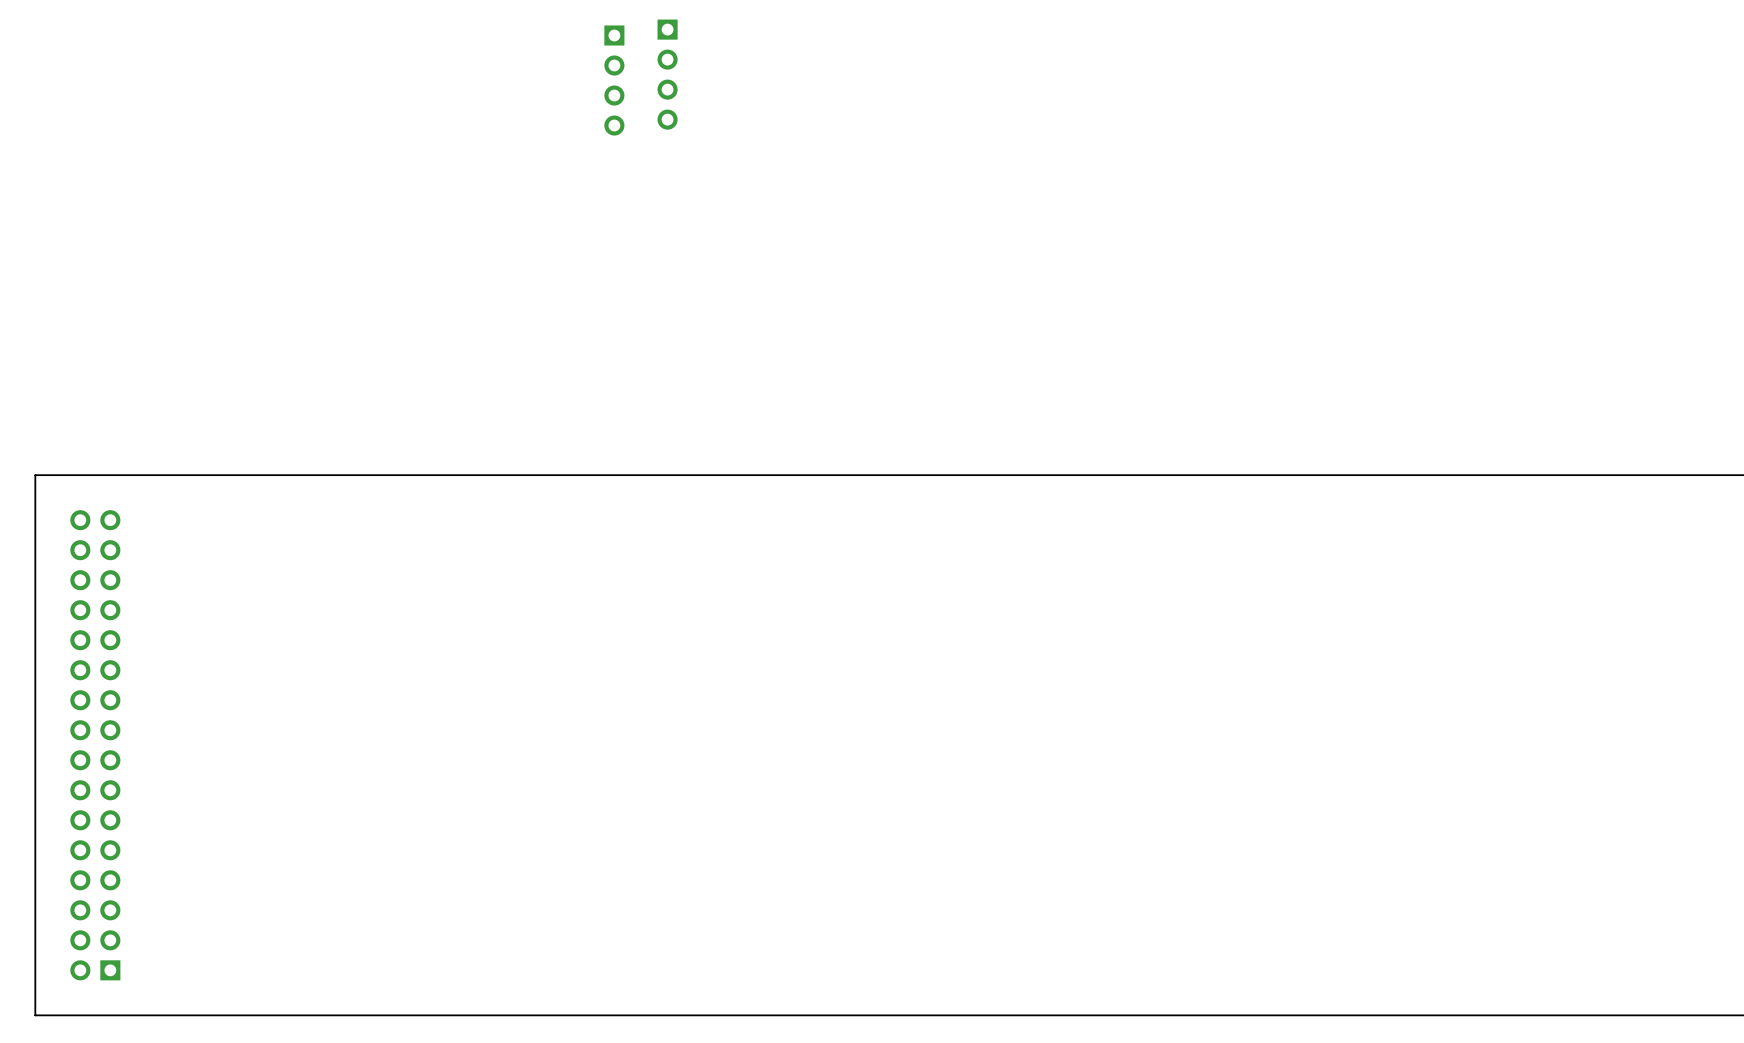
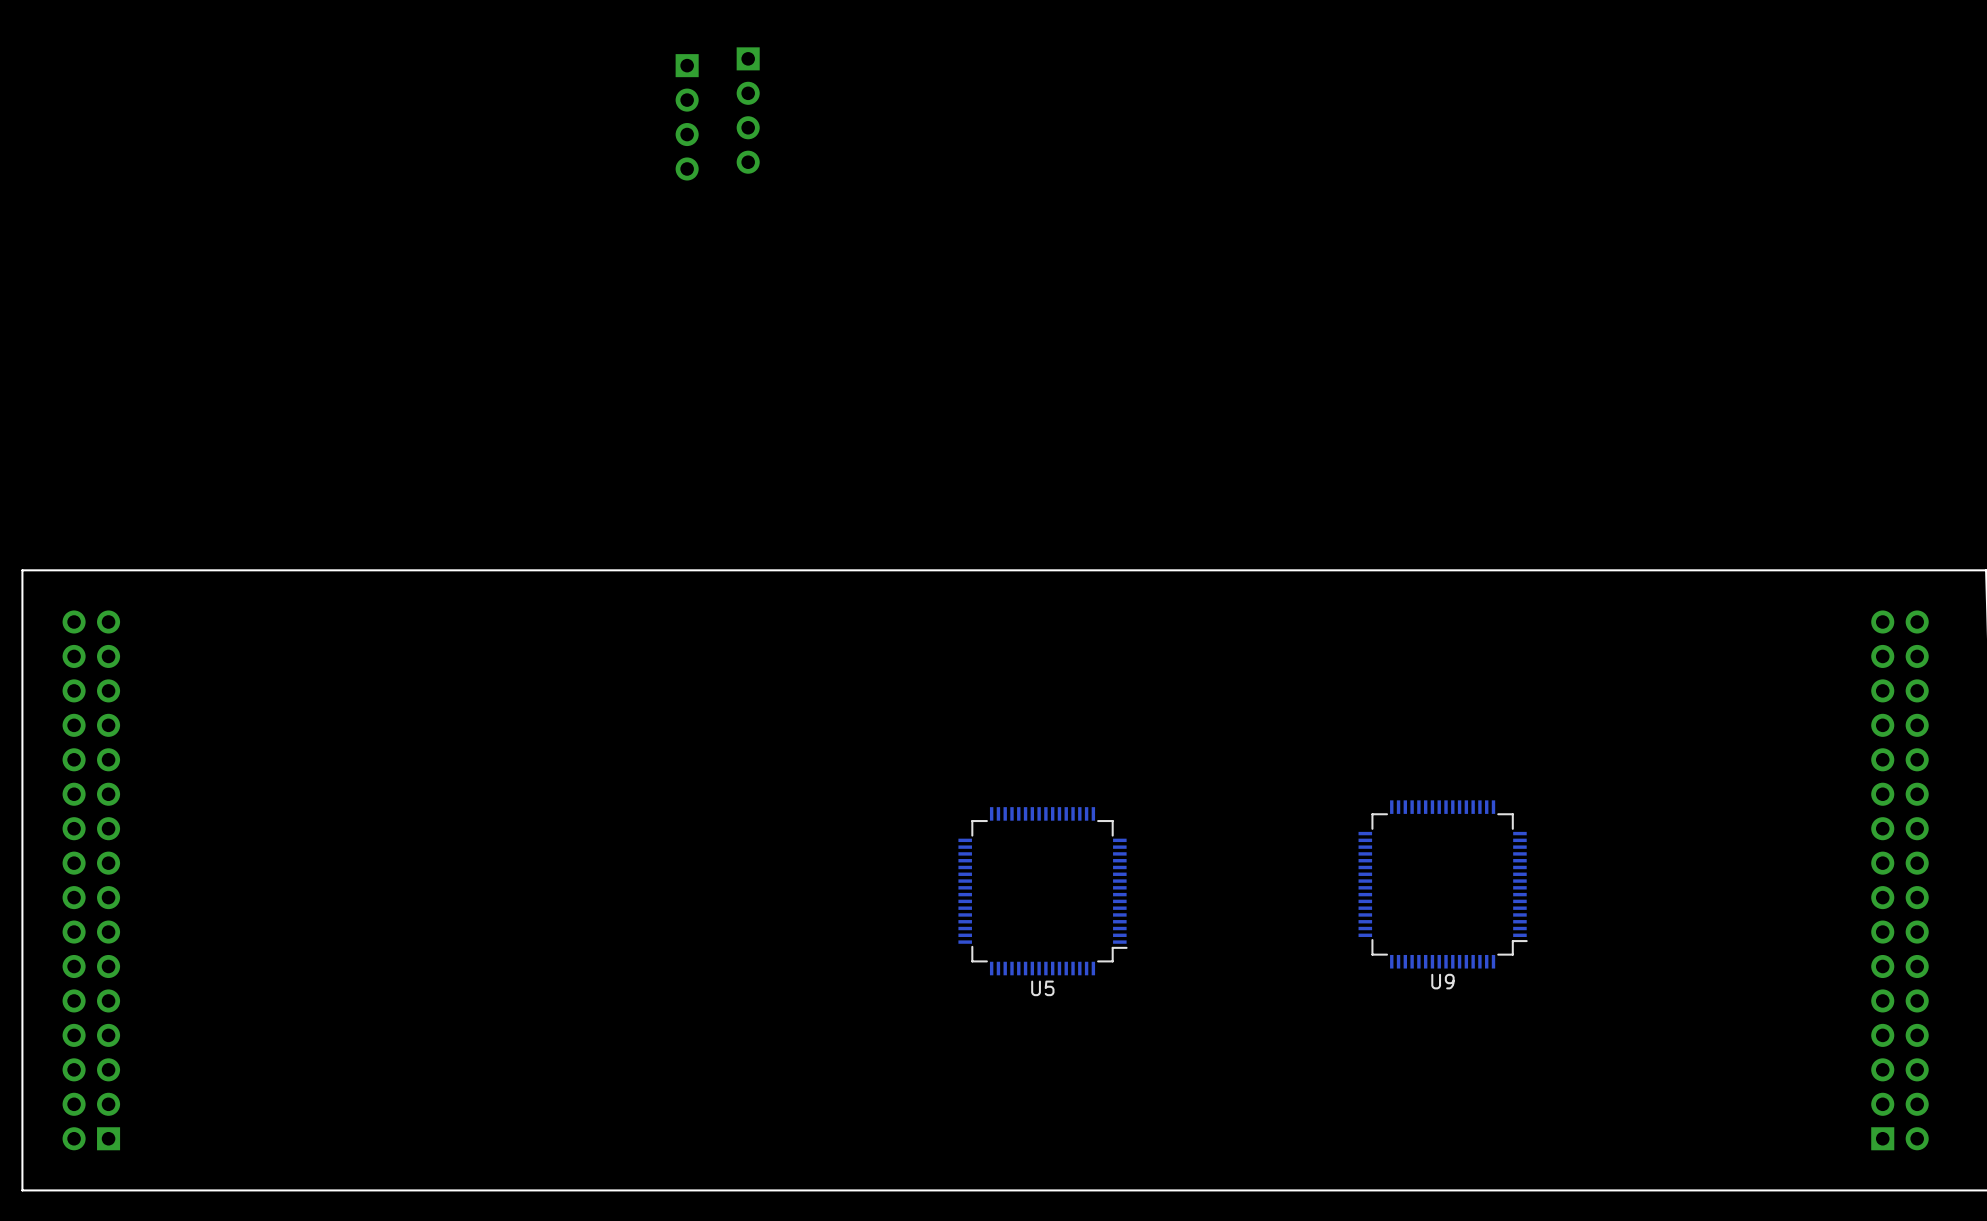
part: none -> (1899, 880)
U9: none -> (1443, 884)
U5: none -> (1043, 891)

